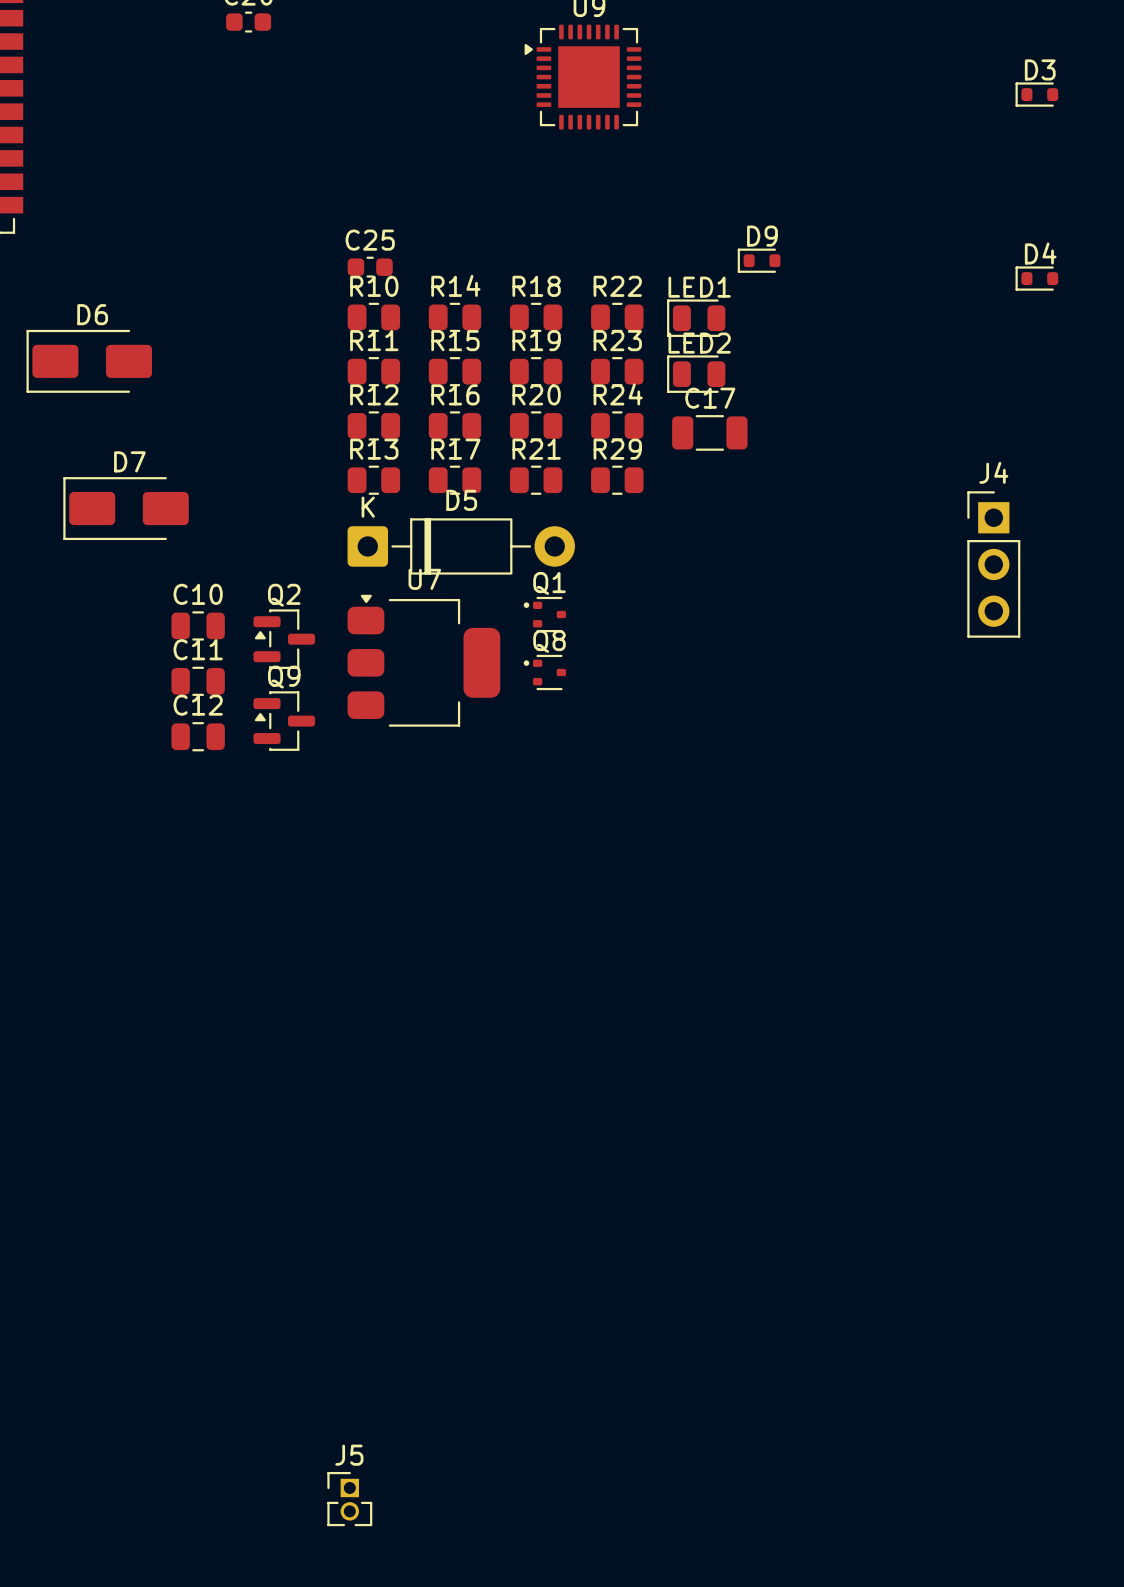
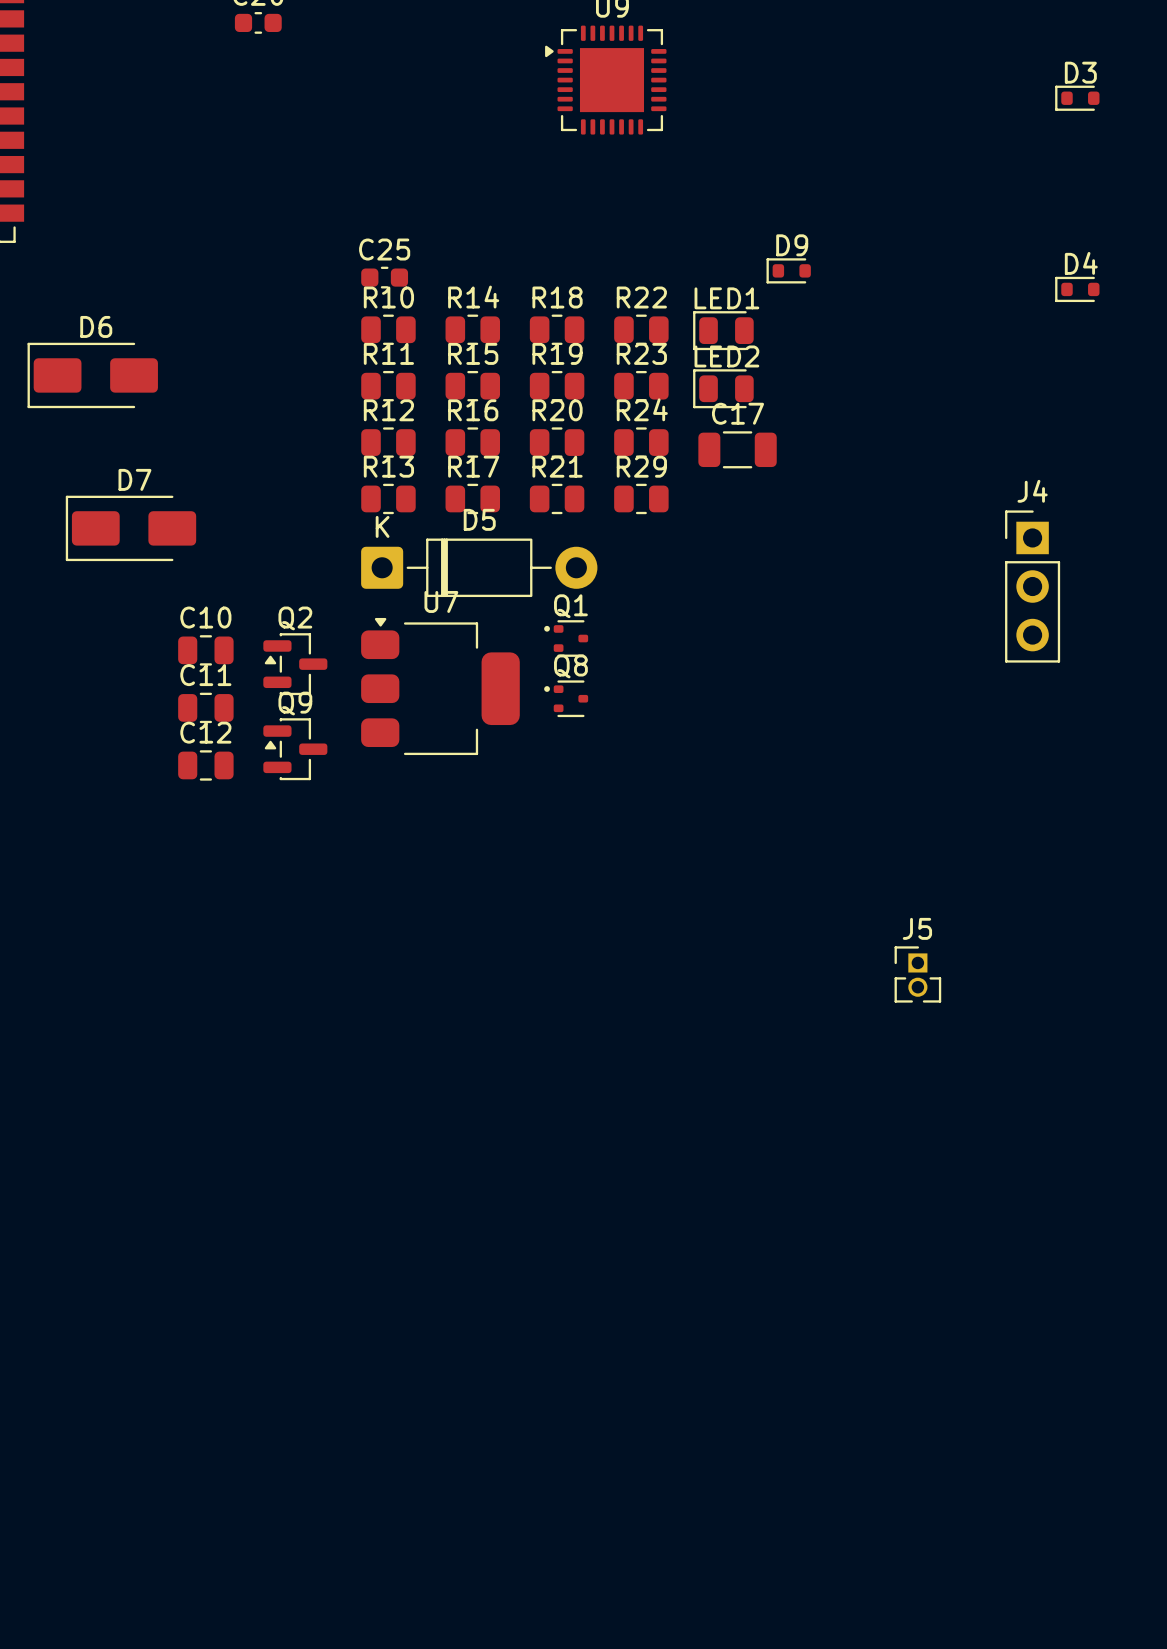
J5 position: (349, 1499) -> (917, 974)

